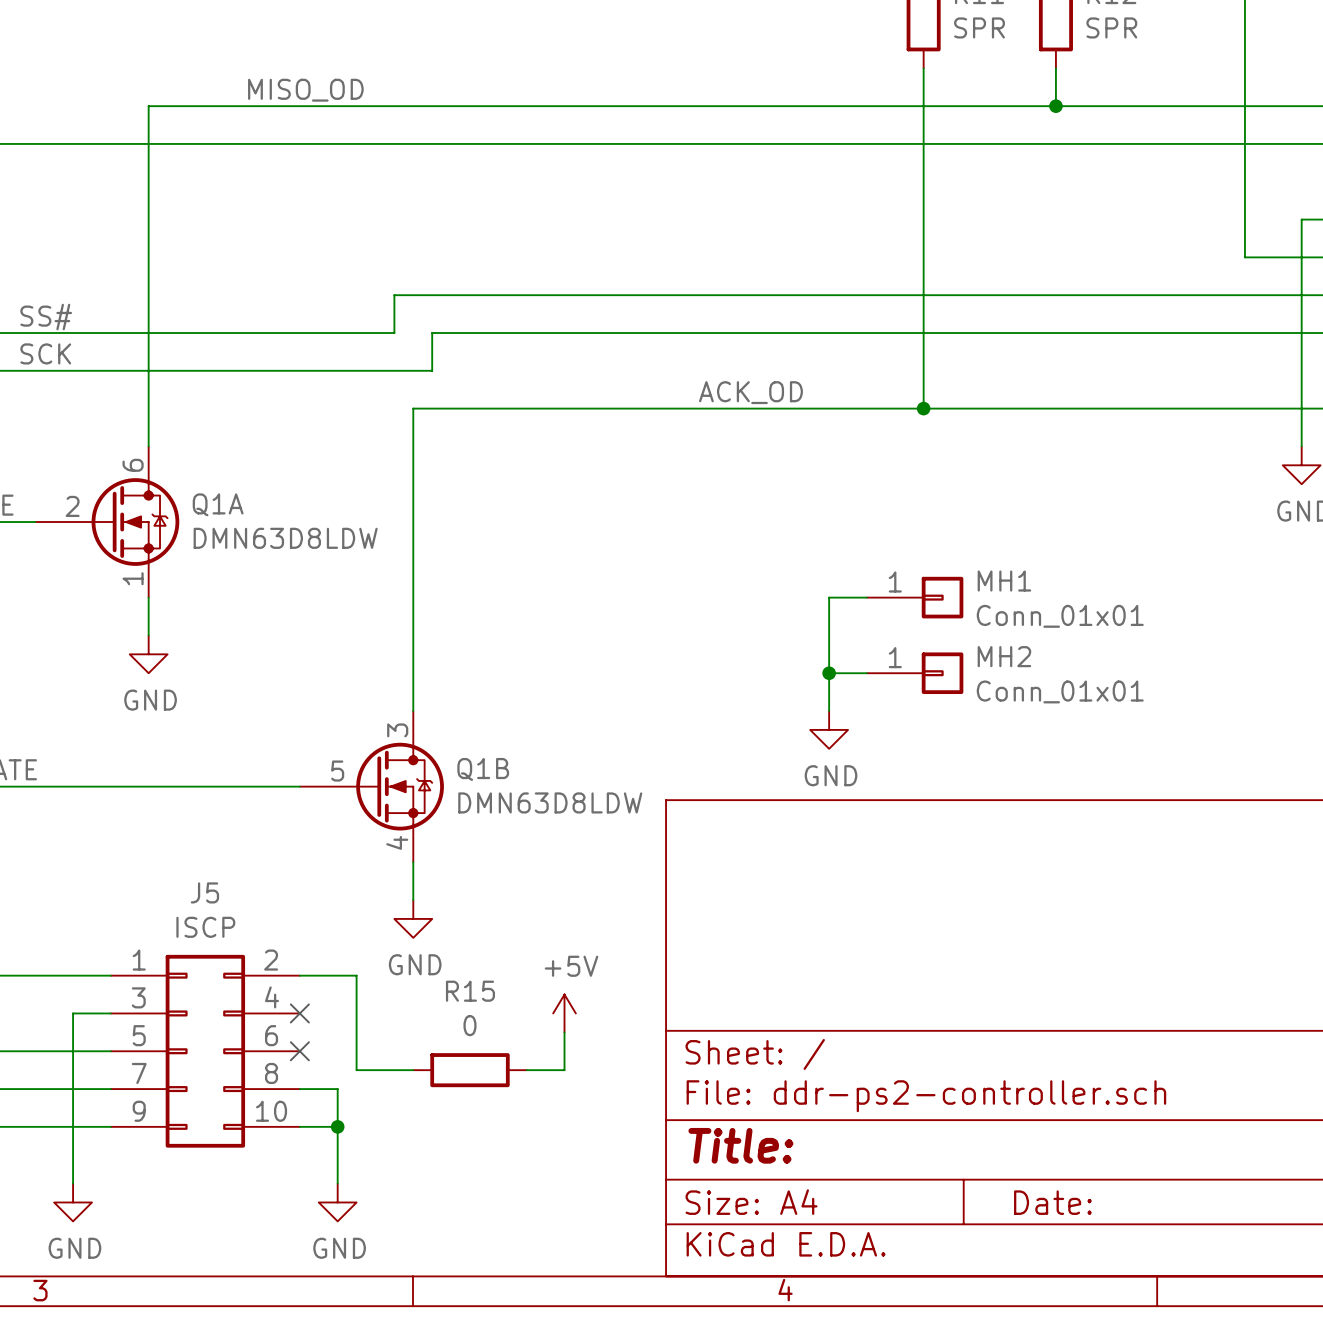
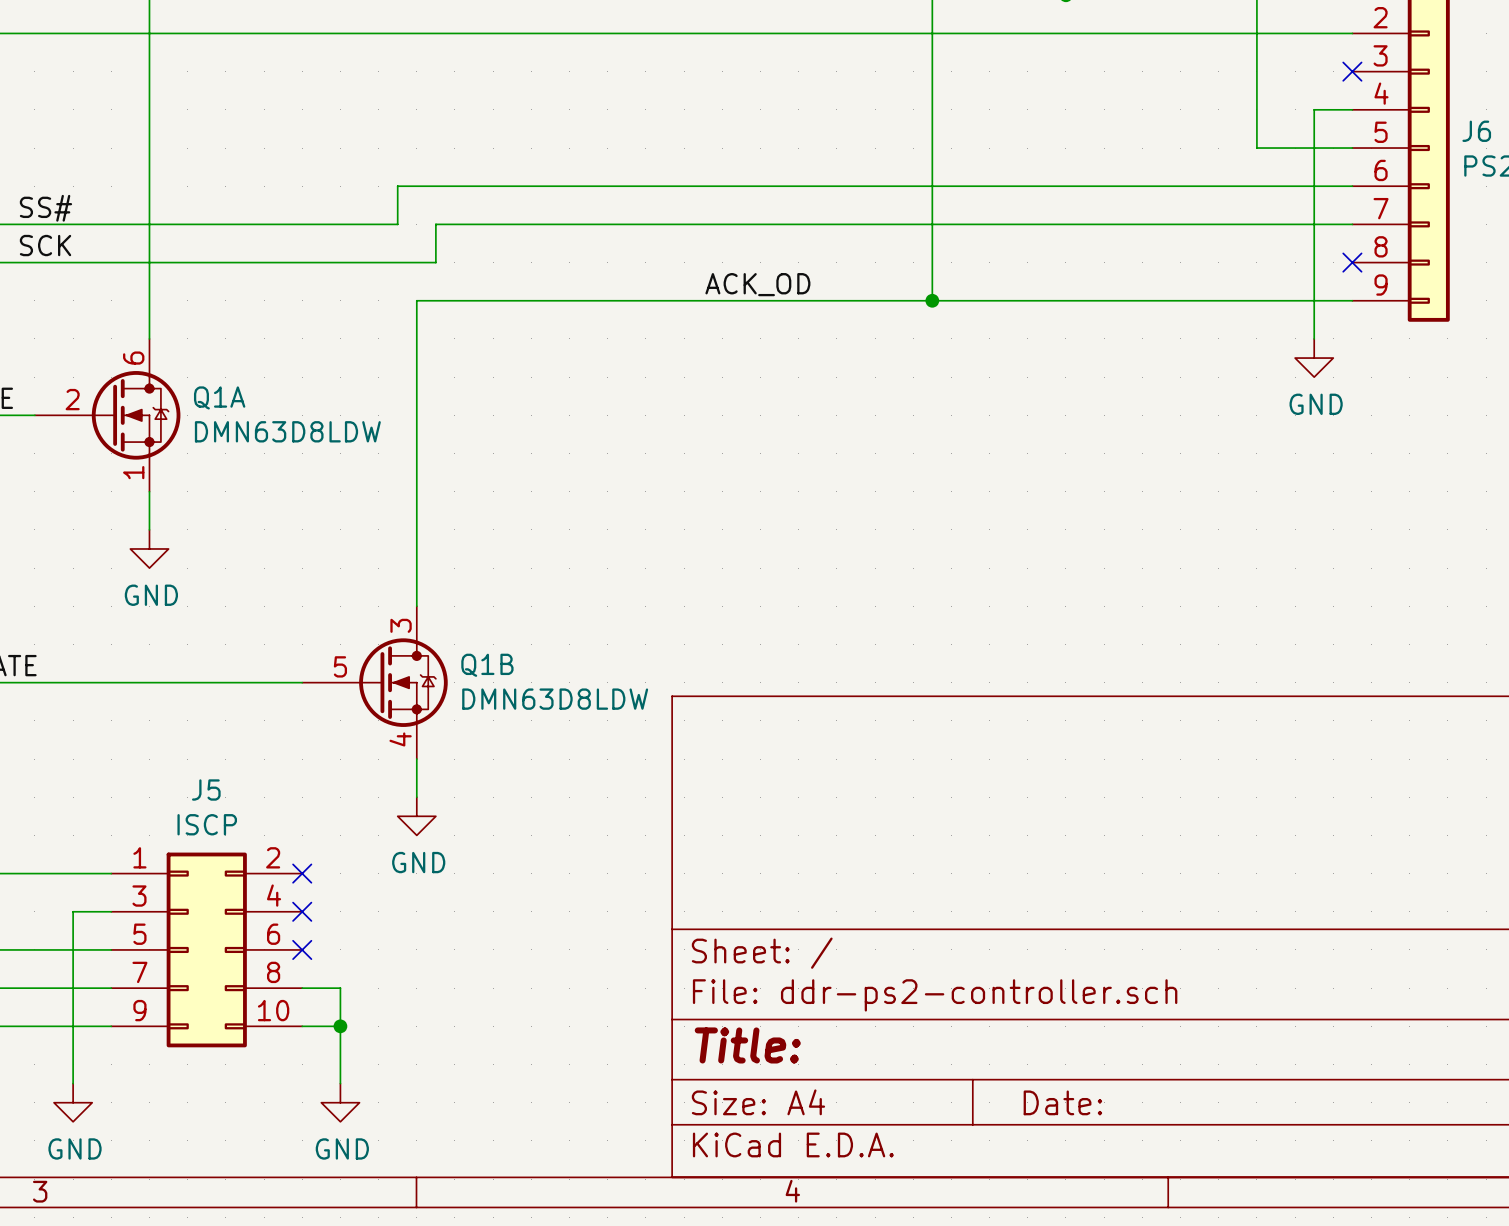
wire: (866, 597) (829, 597) (829, 711) -> none
MH1: Conn_01x01 (915, 597) -> none
wire: (829, 673) (866, 673) -> none
junction: (829, 673) -> none
MH2: Conn_01x01 (915, 673) -> none
power symbol: GND (829, 729) -> none
wire: (299, 975) (356, 975) (356, 1070) (413, 1070) -> none
no-connect mark: none -> (302, 873)
power symbol: +5V (564, 1013) -> none
wire: (564, 1032) (564, 1070) (526, 1070) -> none
R15: 0 (470, 1070) -> none

